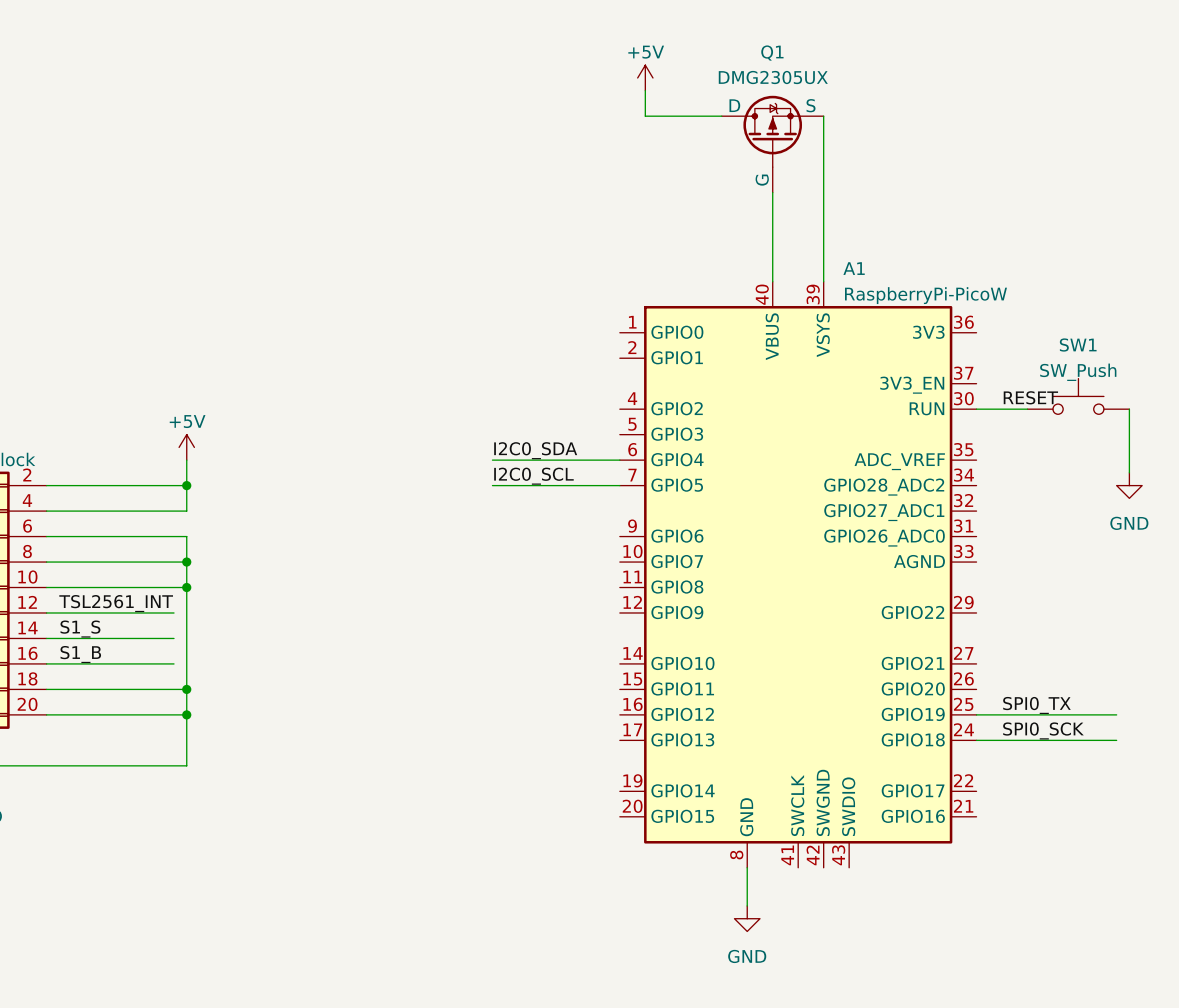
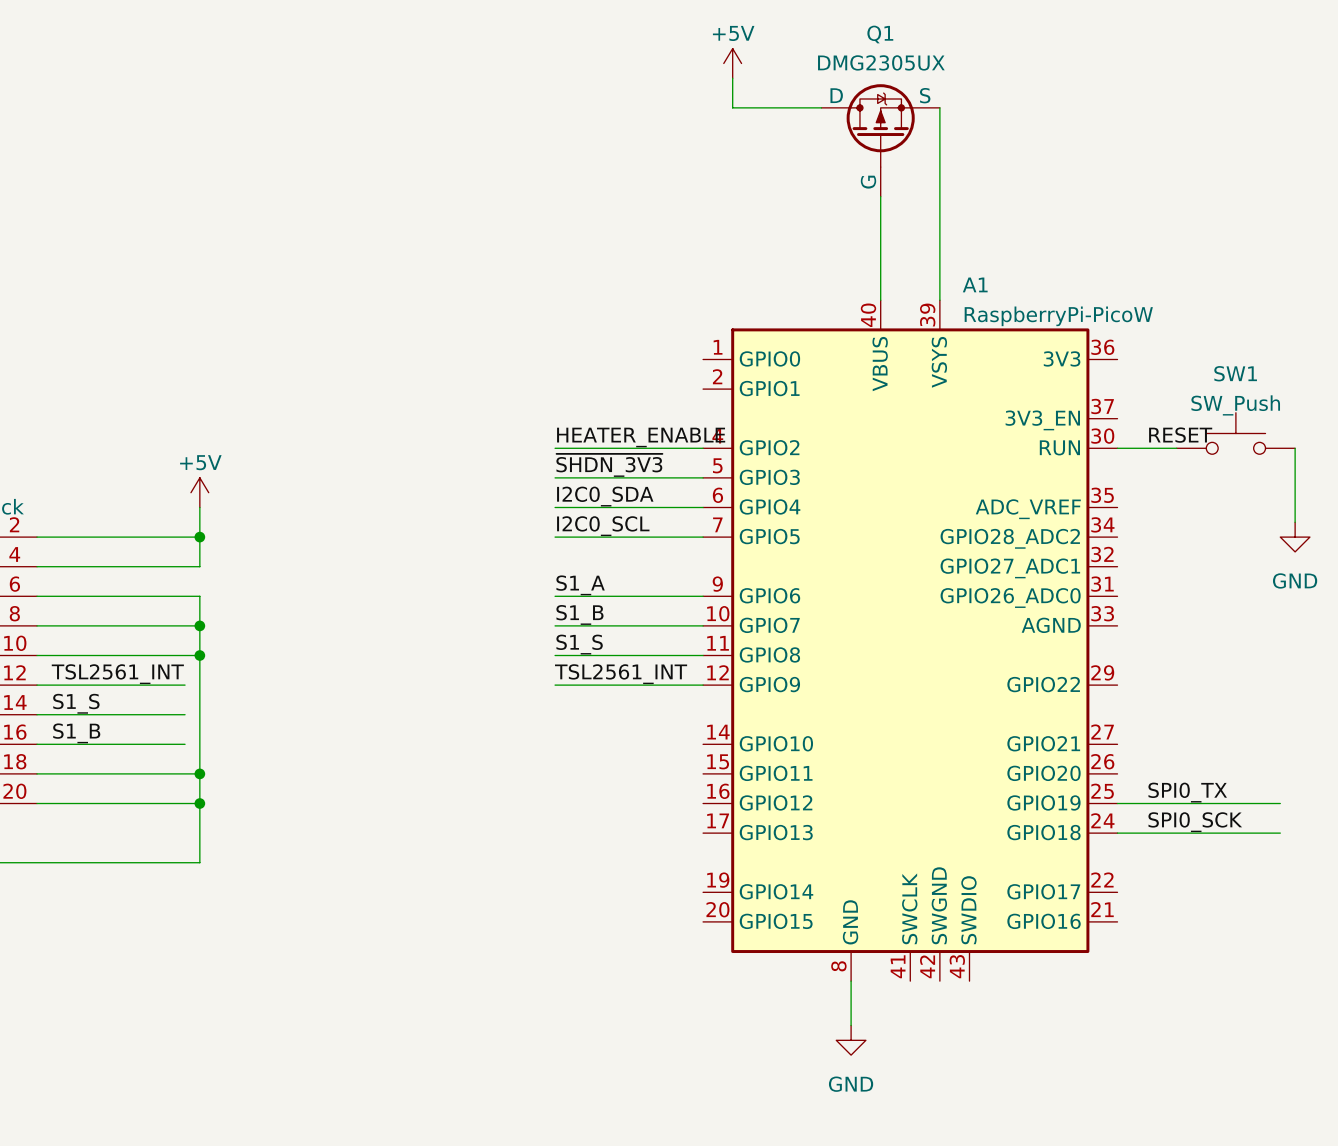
label: none -> HEATER_ENABLE (641, 437)
wire: none -> (555, 448) (703, 448)
label: none -> ~{SHDN_3V3} (609, 465)
wire: none -> (555, 477) (703, 477)
label: none -> S1_A (580, 585)
wire: none -> (555, 596) (703, 596)
label: none -> S1_B (579, 614)
wire: none -> (555, 625) (703, 625)
label: none -> S1_S (579, 644)
wire: none -> (555, 655) (703, 655)
label: none -> TSL2561_INT (621, 674)
wire: none -> (555, 685) (703, 685)

